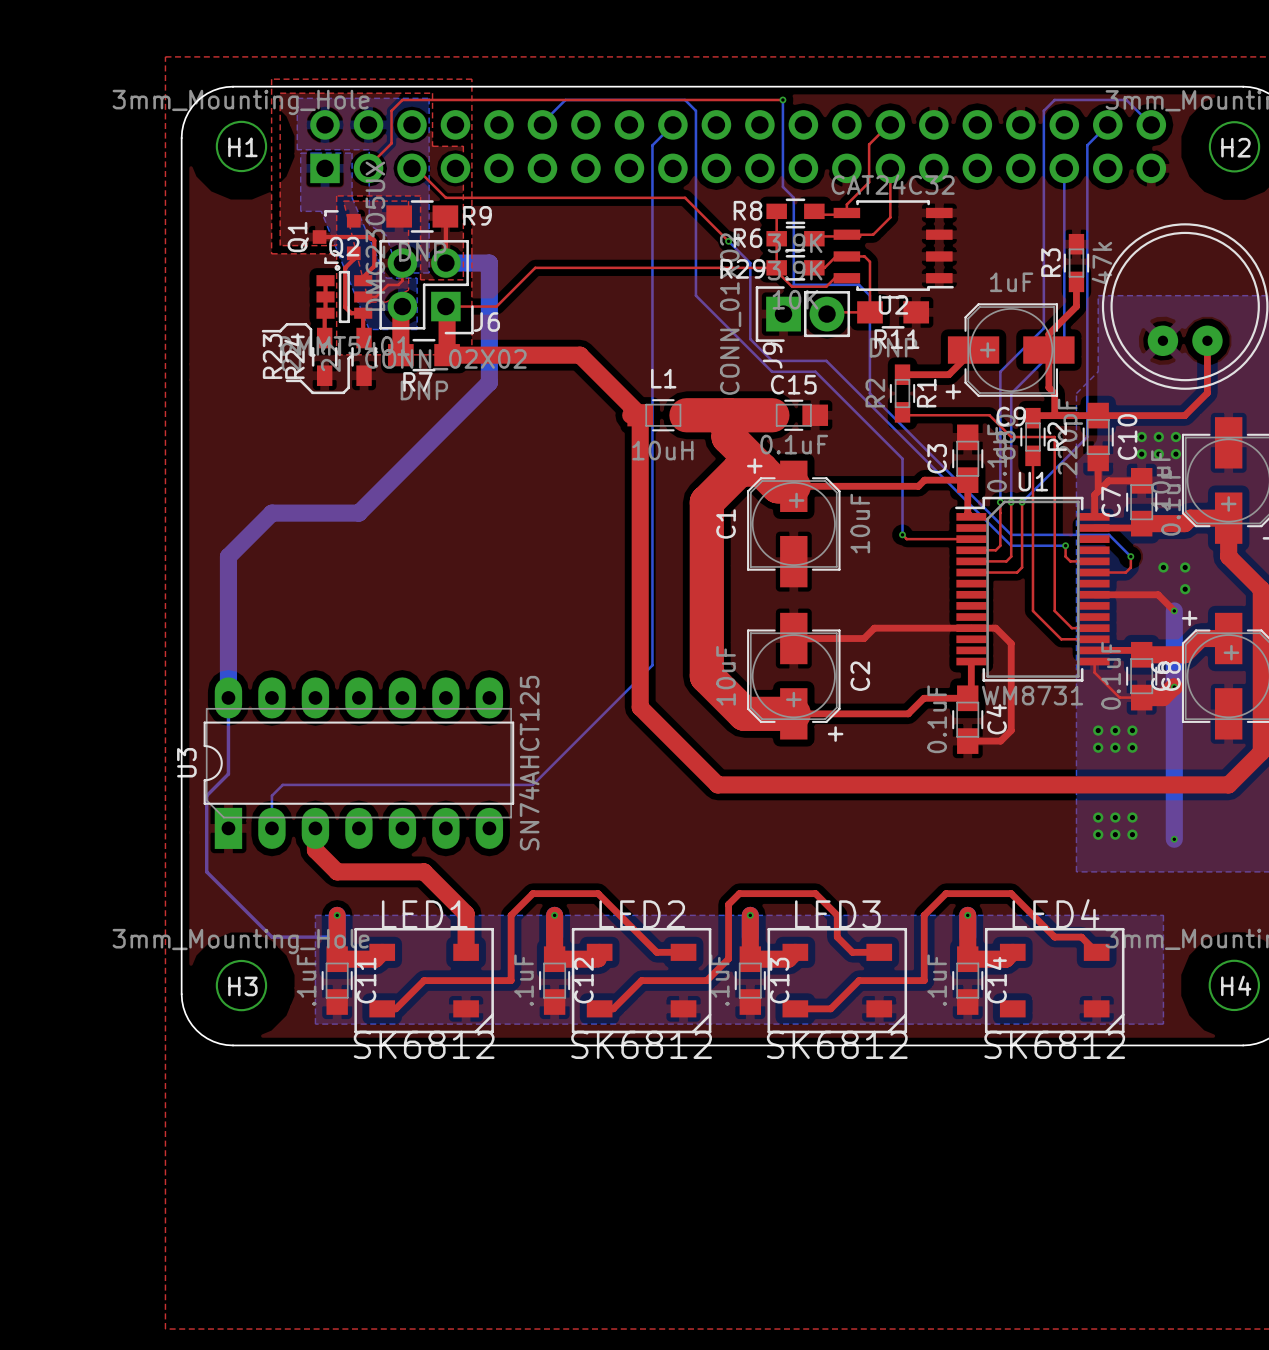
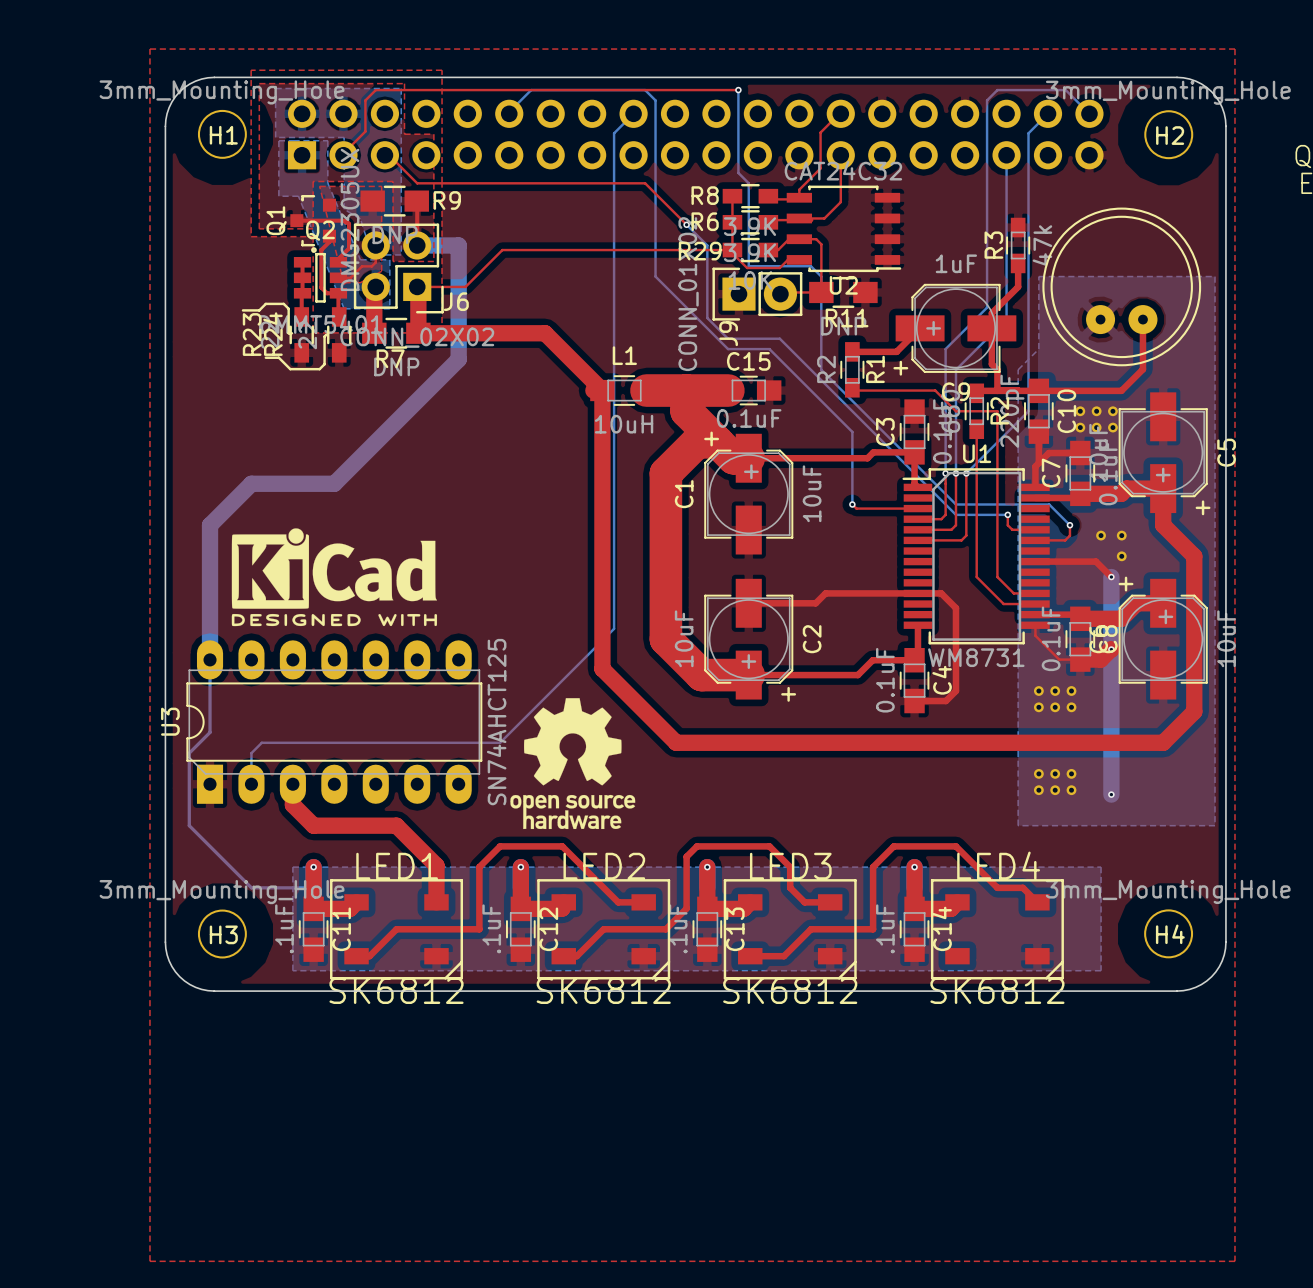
drawing: none -> [231, 528, 438, 627]
drawing: none -> [510, 698, 636, 830]

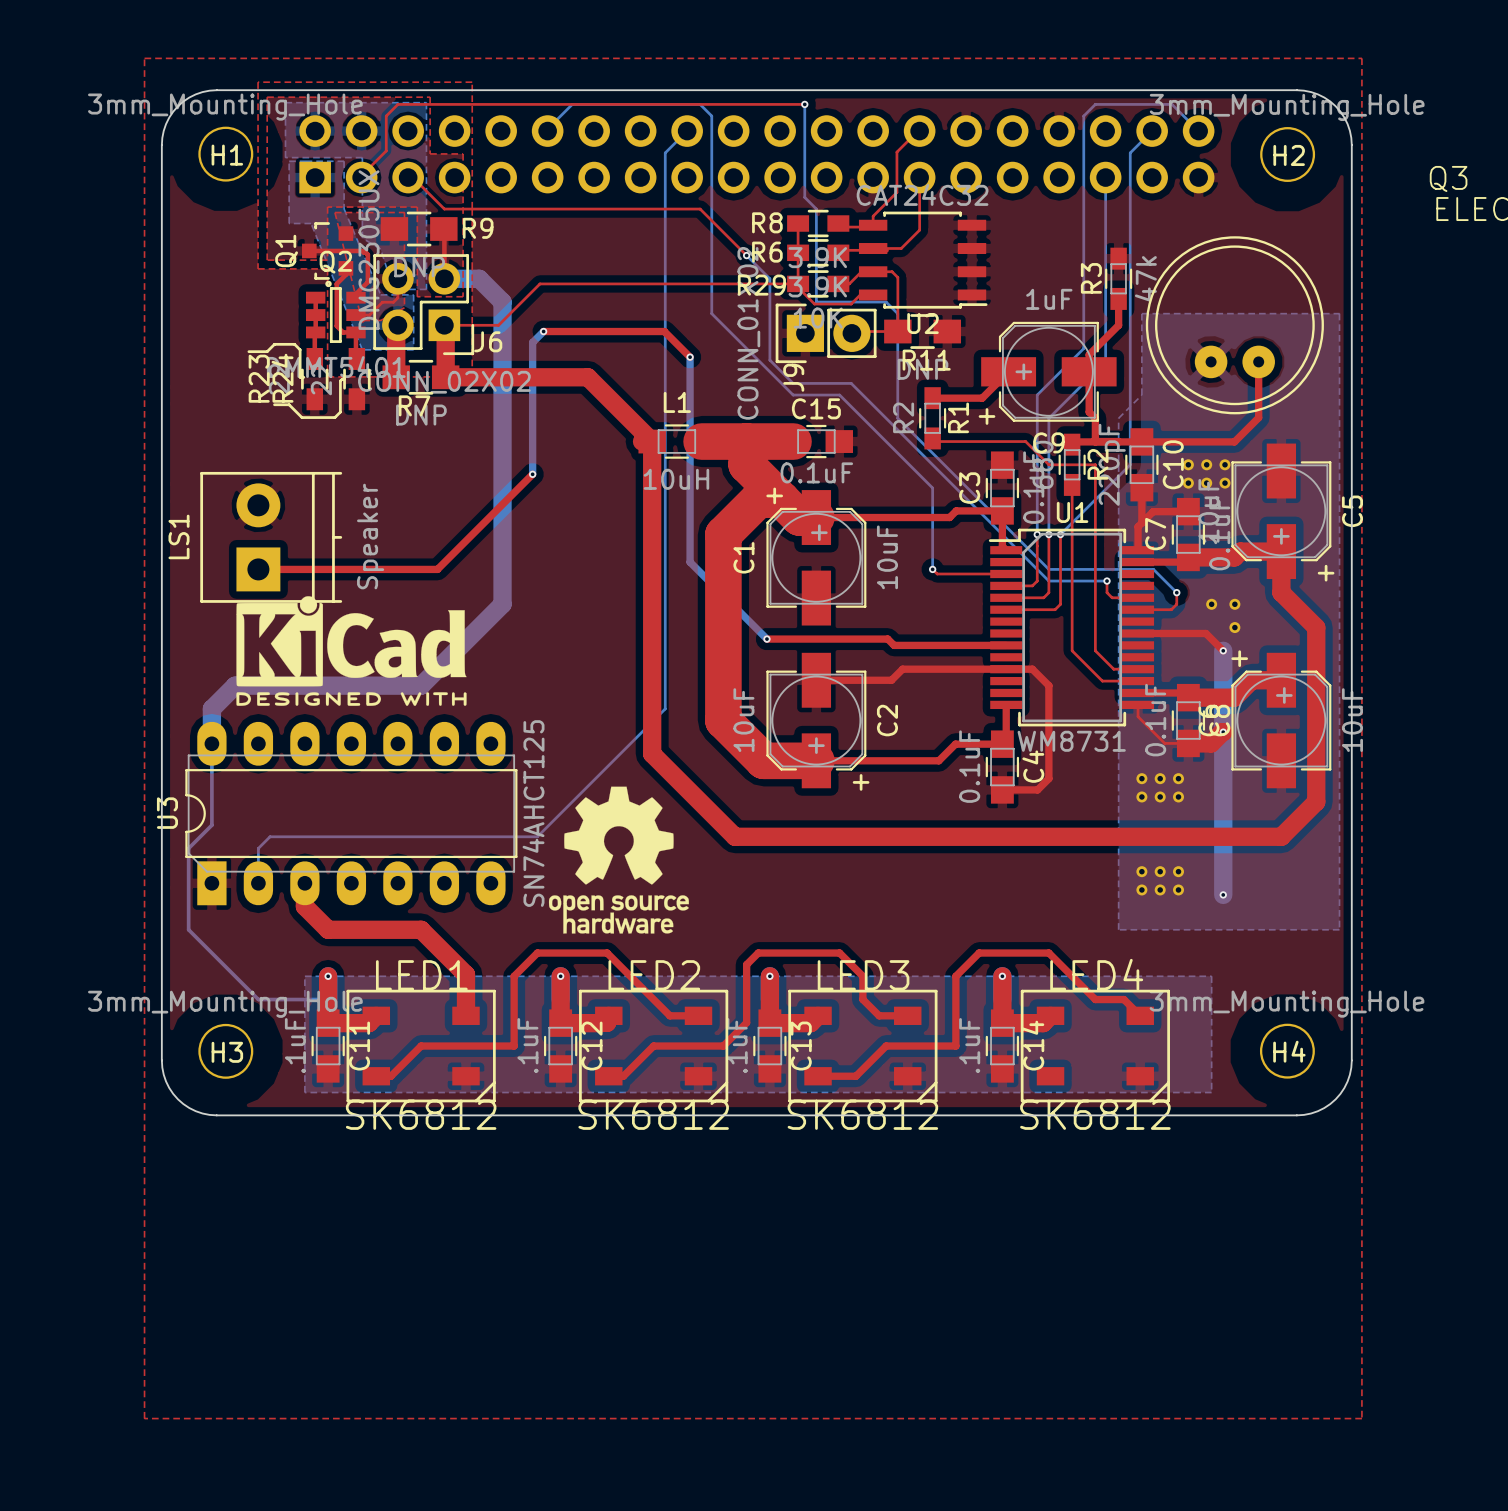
bottom track: (448, 245) (458, 245) (458, 359) (334, 483) (251, 483) (210, 525) (210, 628) -> (479, 278) (502, 302) (502, 604) (421, 685) (235, 685) (211, 708)
top track: none -> (543, 331) (664, 331) (690, 357)
bottom track: none -> (543, 331) (532, 342) (532, 474)
via: none -> (543, 331)
bottom track: none -> (690, 357) (690, 562) (766, 639)
via: none -> (690, 357)
top track: none -> (532, 474) (437, 569) (258, 569)
via: none -> (532, 474)
LS1: none -> Speaker (271, 537)
top track: none -> (766, 639) (887, 639) (894, 645) (1006, 645)
via: none -> (766, 639)

